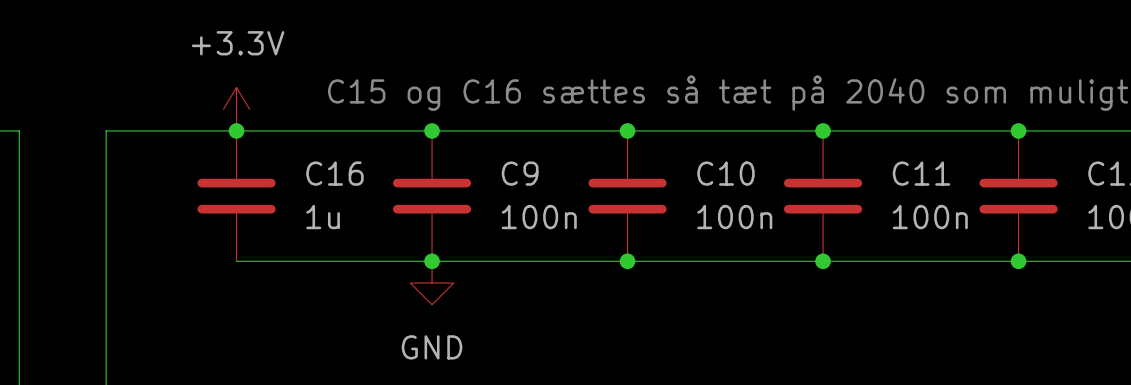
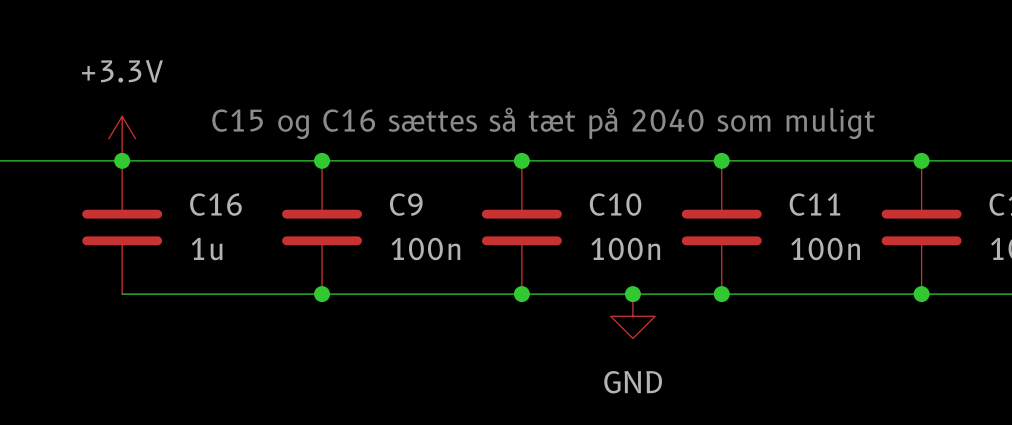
junction: none -> (632, 294)
power symbol position: GND (432, 283) -> GND (632, 316)

